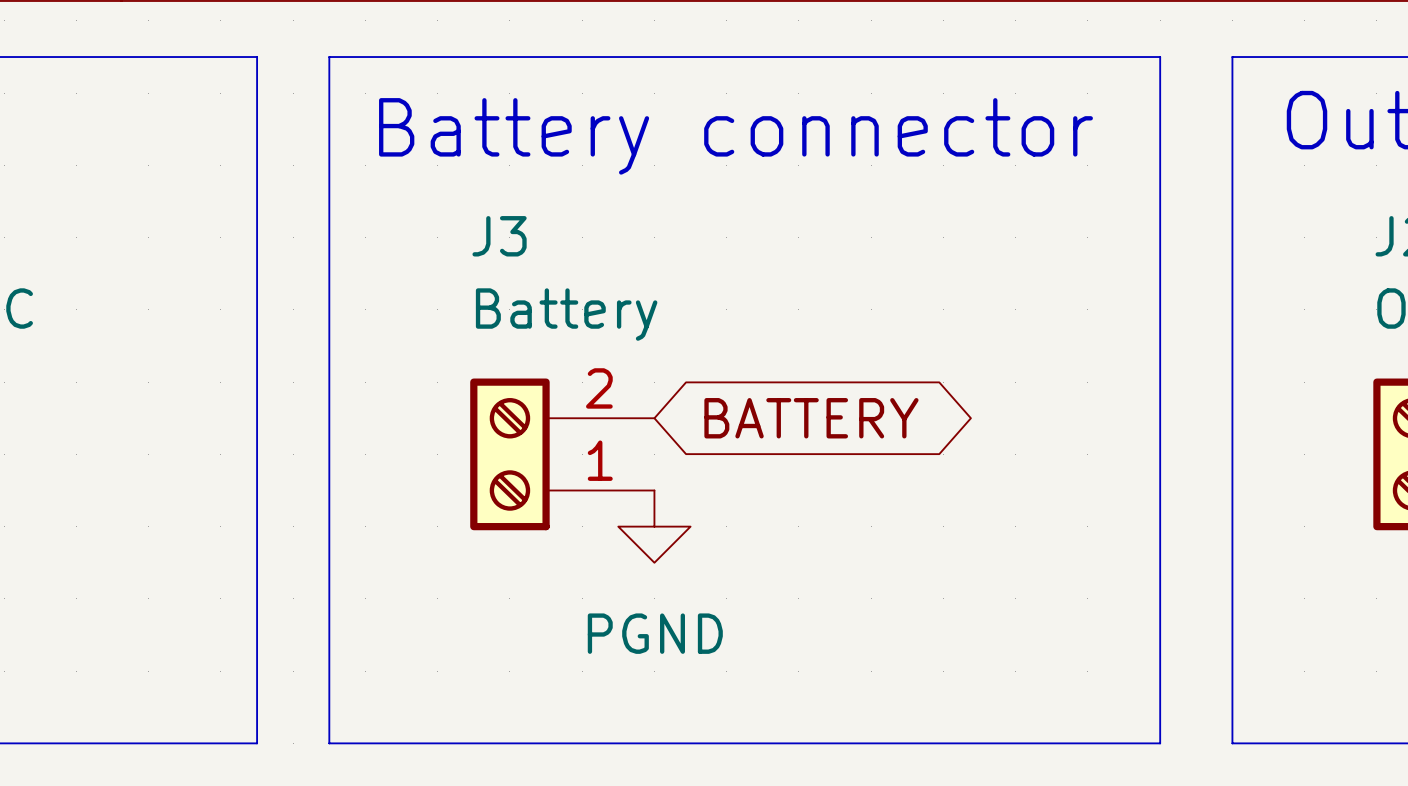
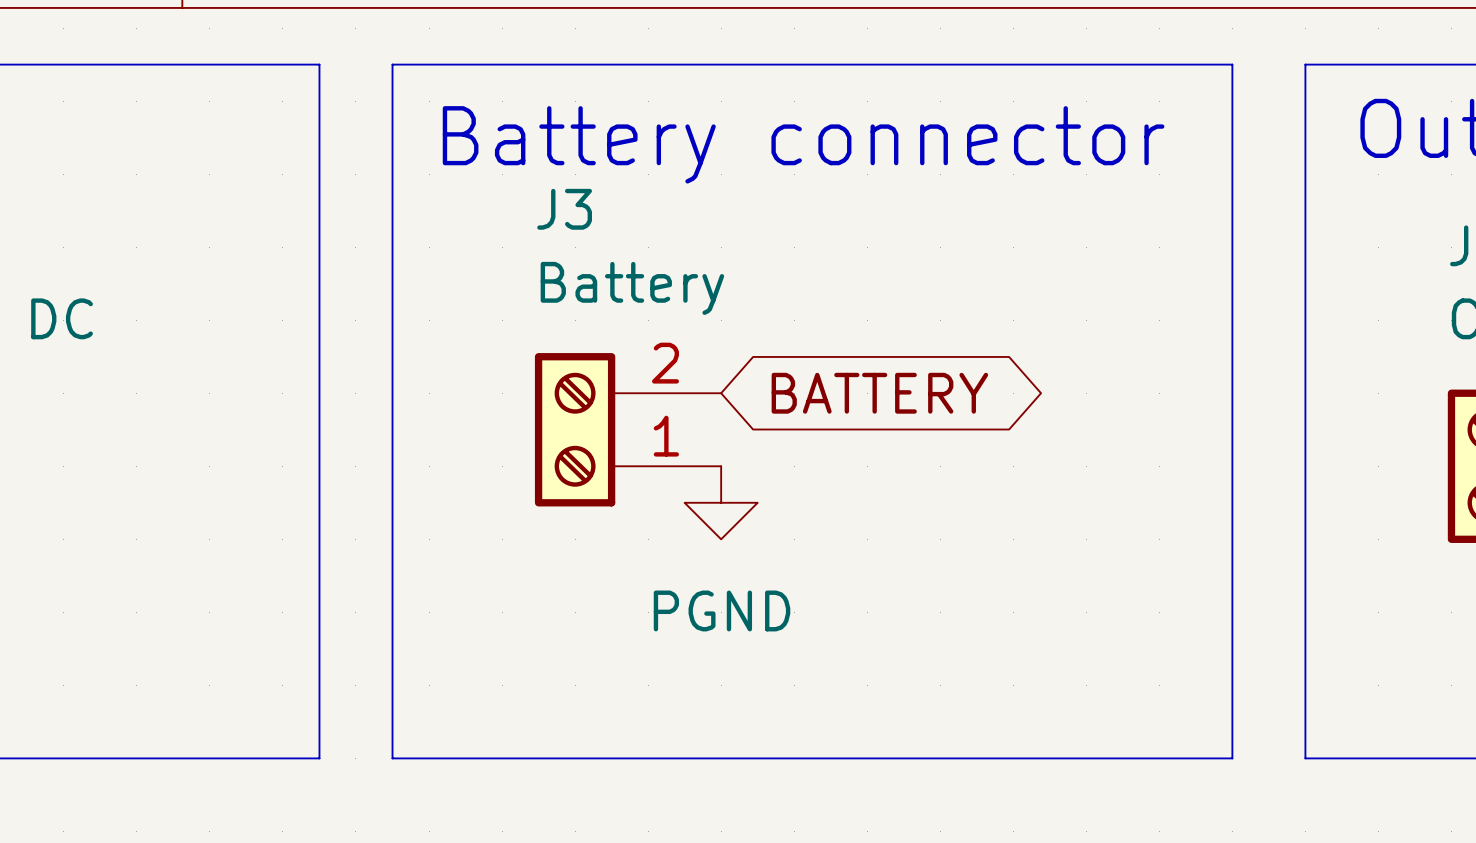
global label position: BATTERY (811, 418) -> BATTERY (879, 393)
J3 position: (562, 454) -> (628, 429)
power symbol position: PGND (654, 526) -> PGND (721, 502)

